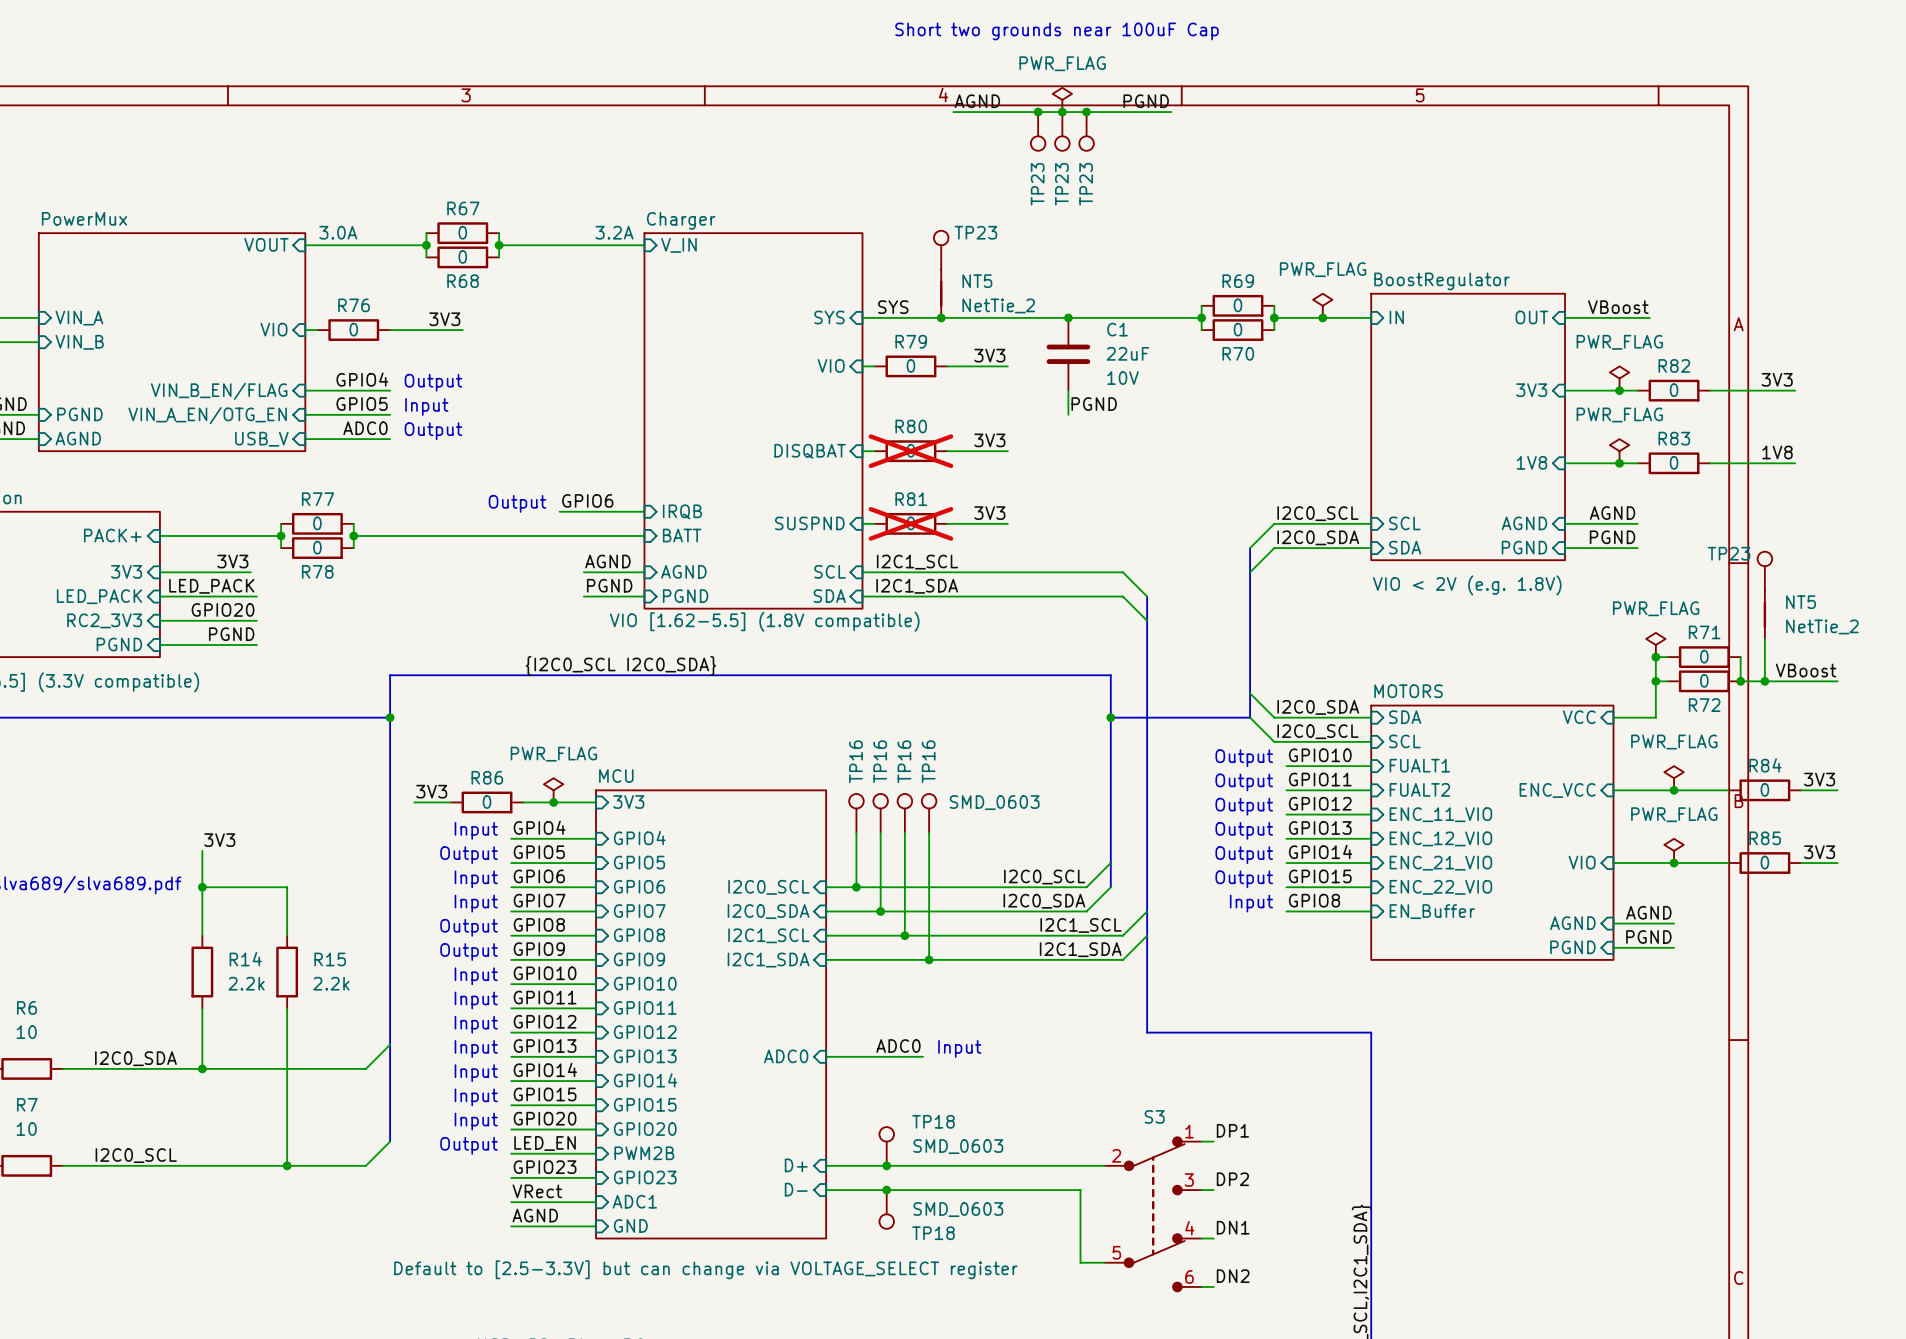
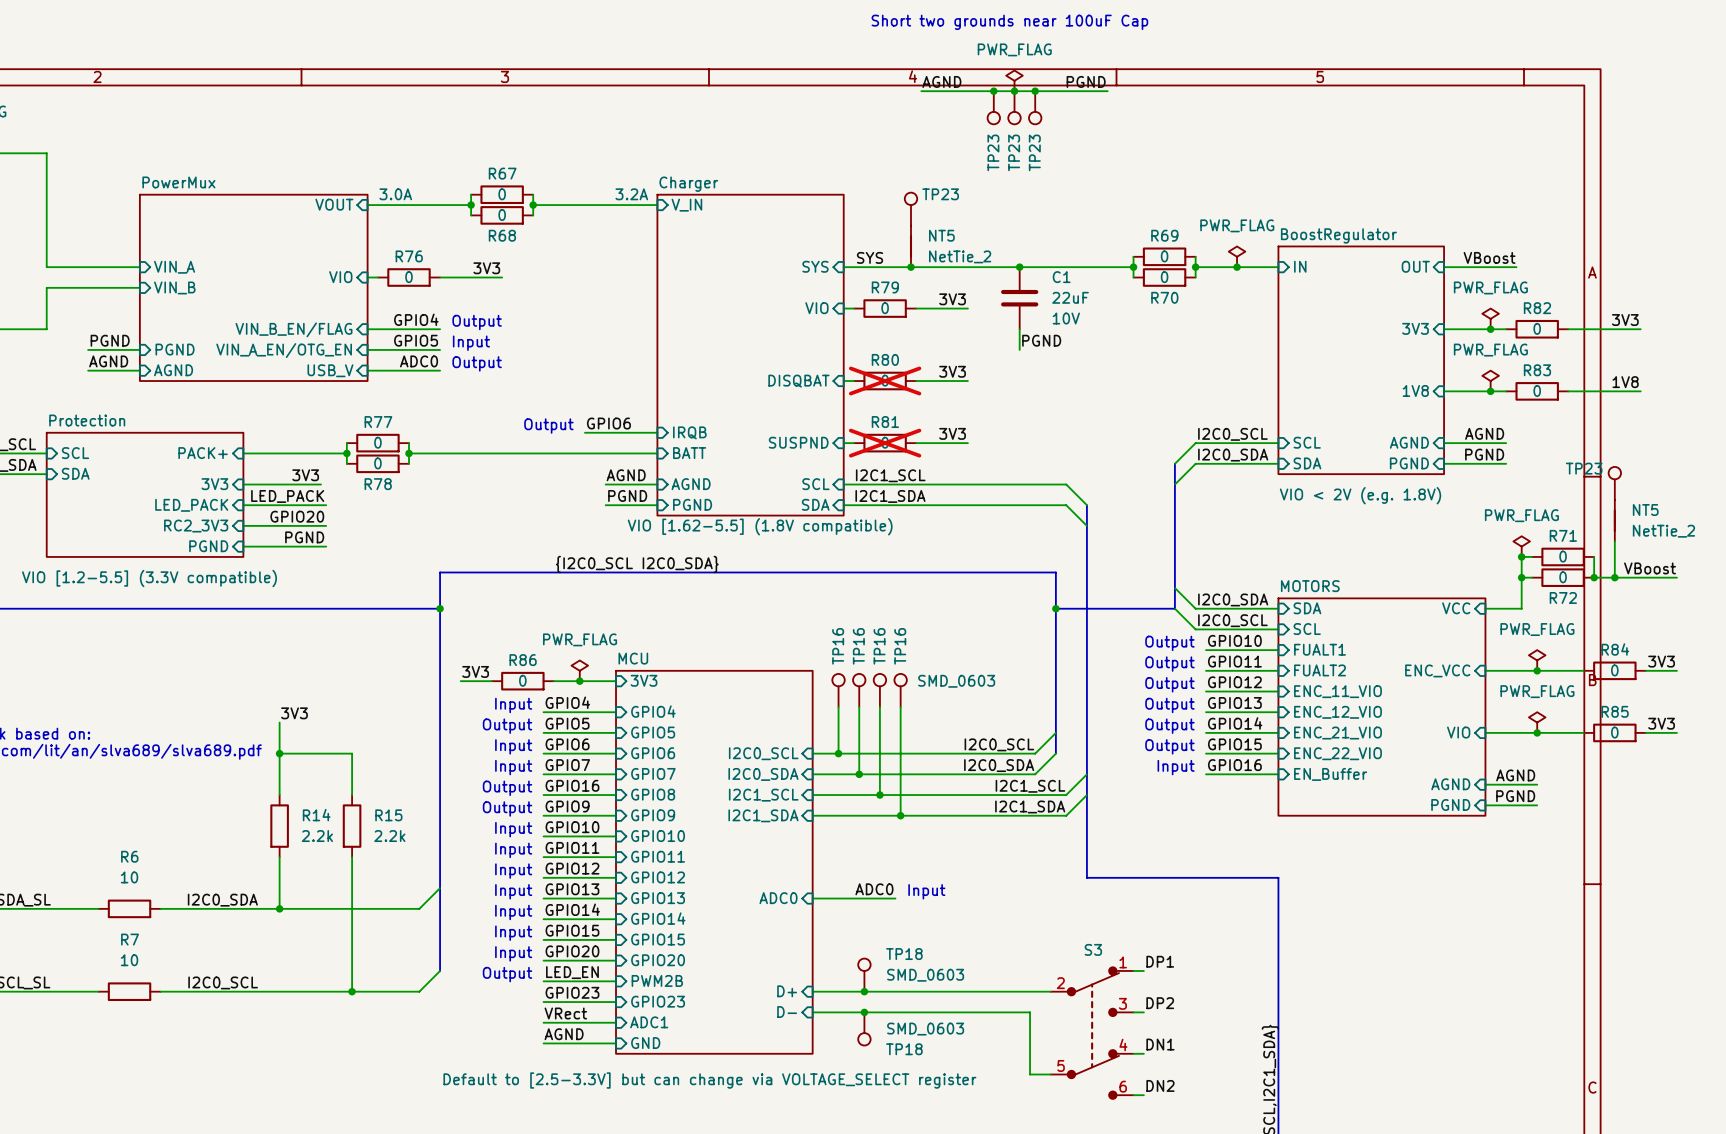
label: GPIO8 (1314, 900) -> GPIO16 (1234, 765)
label: GPIO8 (539, 924) -> GPIO16 (572, 785)

